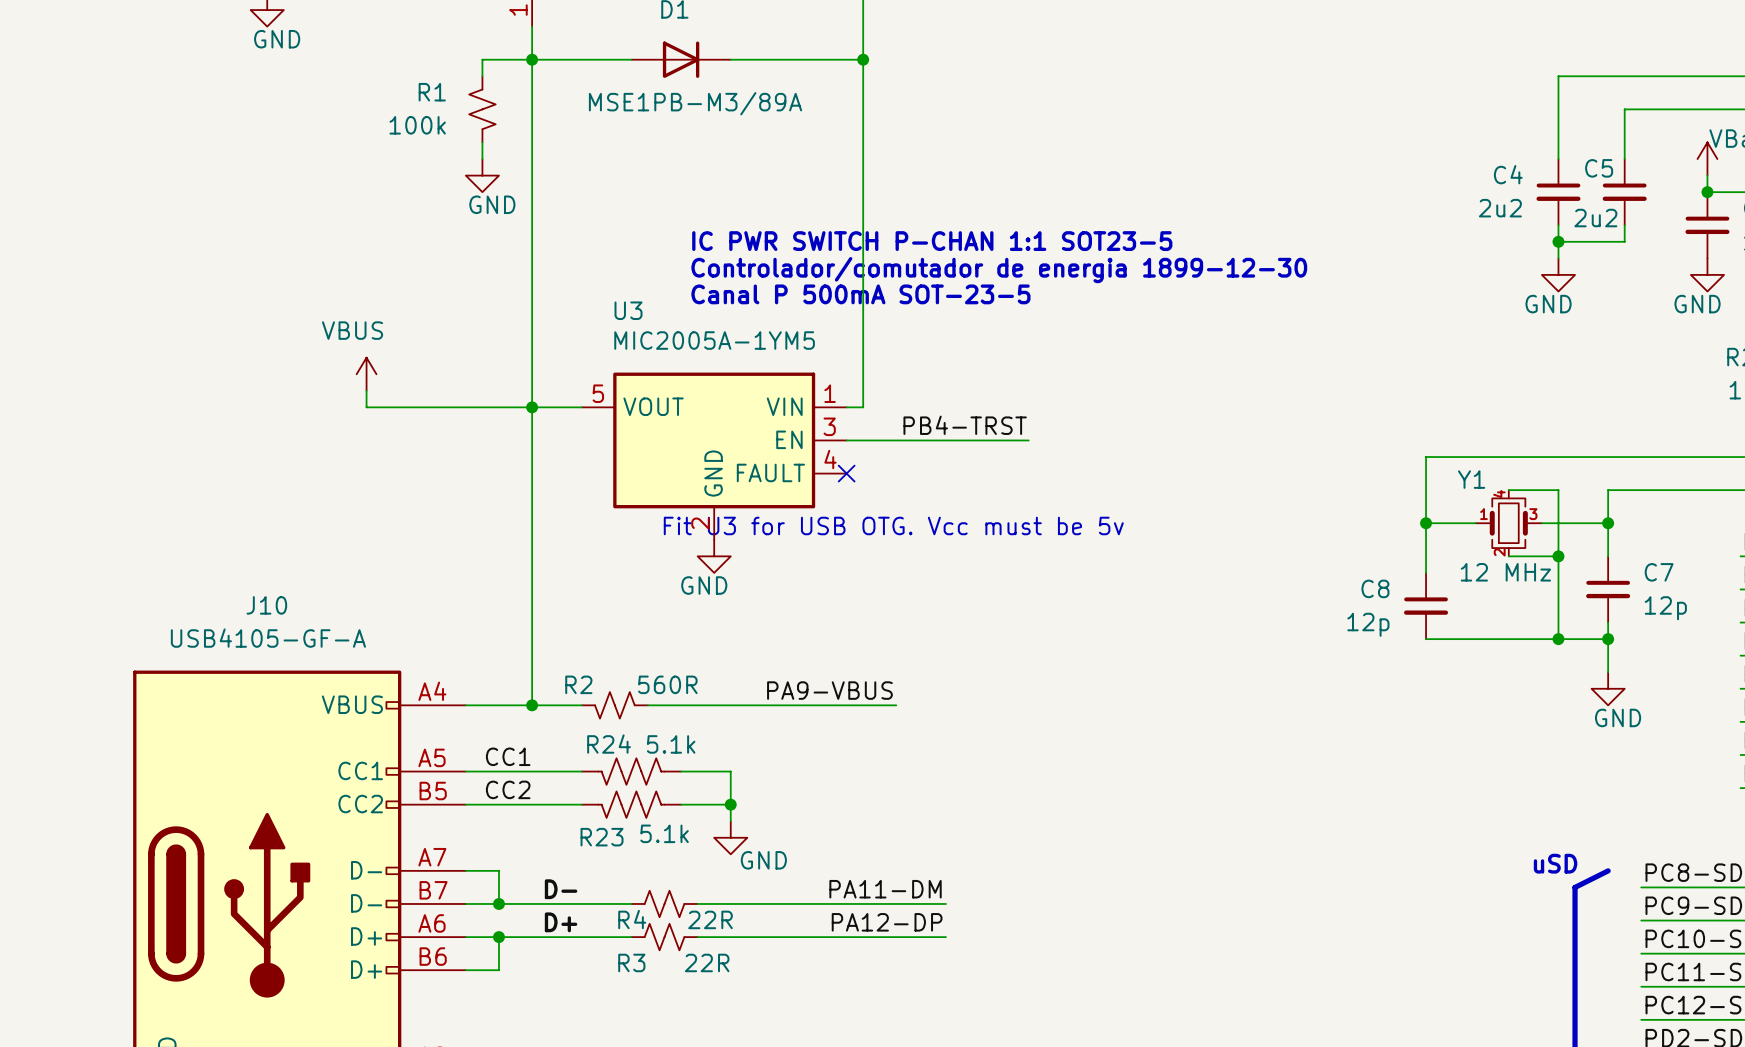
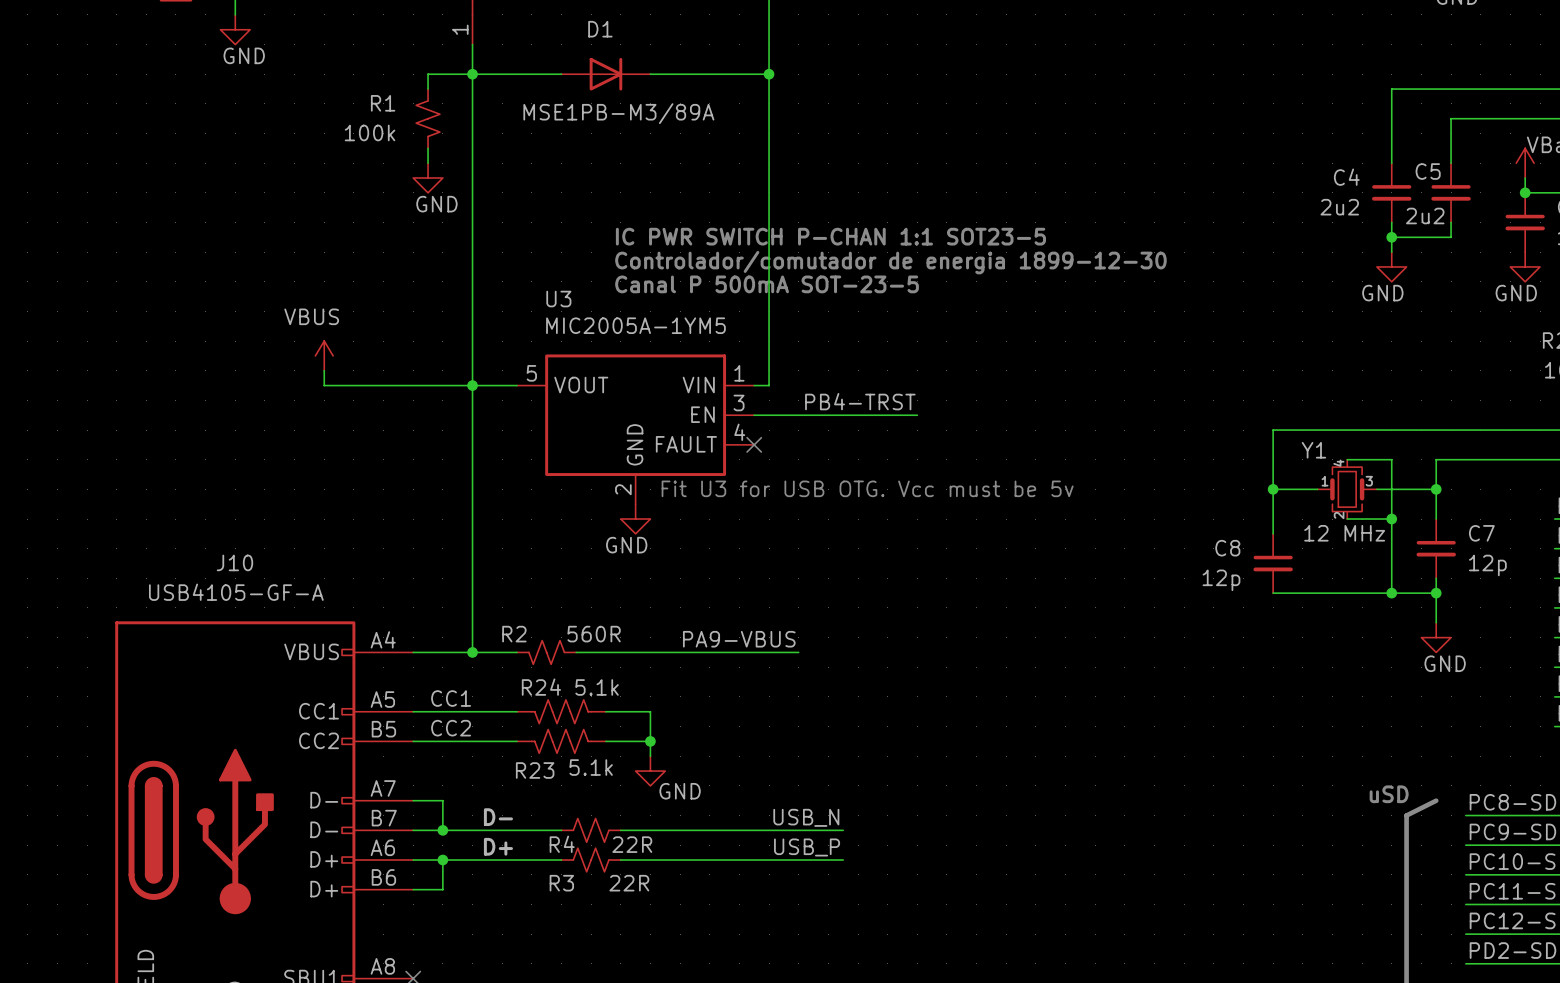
text position: Fit U3 for USB OTG. Vcc must be 5v (893, 525) -> Fit U3 for USB OTG. Vcc must be 5v (867, 488)
label: PA11-DM (885, 889) -> USB_N (806, 817)
label: PA12-DP (887, 922) -> USB_P (807, 847)

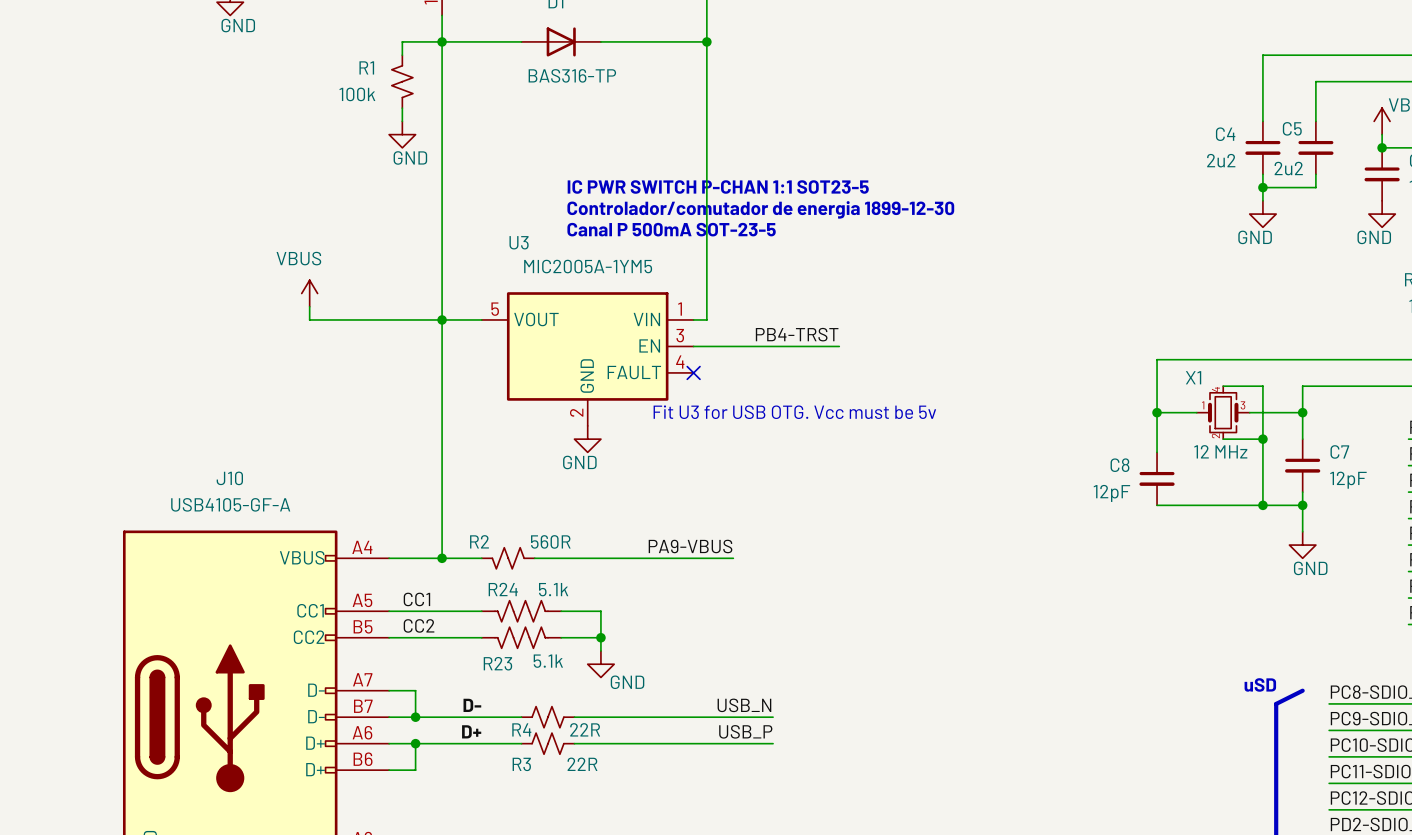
D1 value: MSE1PB-M3/89A (618, 113) -> BAS316-TP (572, 75)
Y1 name: Y1 (1313, 450) -> X1 (1193, 377)
C7 value: 12p (1487, 565) -> 12pF (1348, 480)
C8 value: 12p (1221, 580) -> 12pF (1111, 493)

